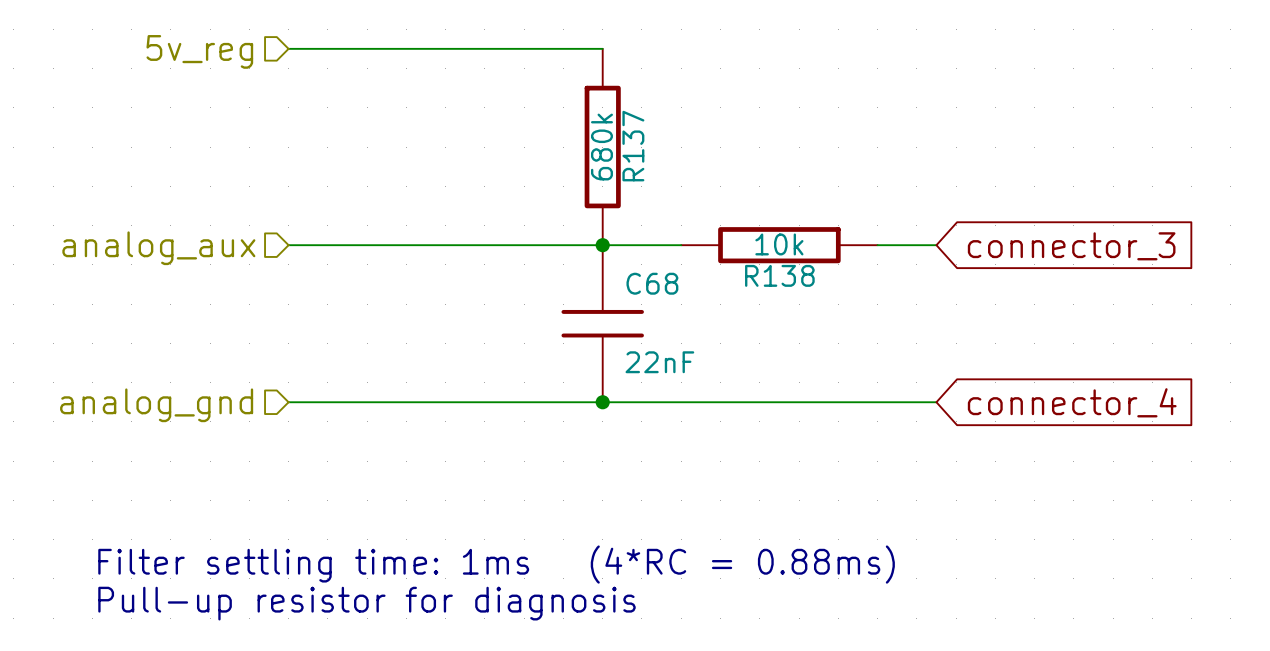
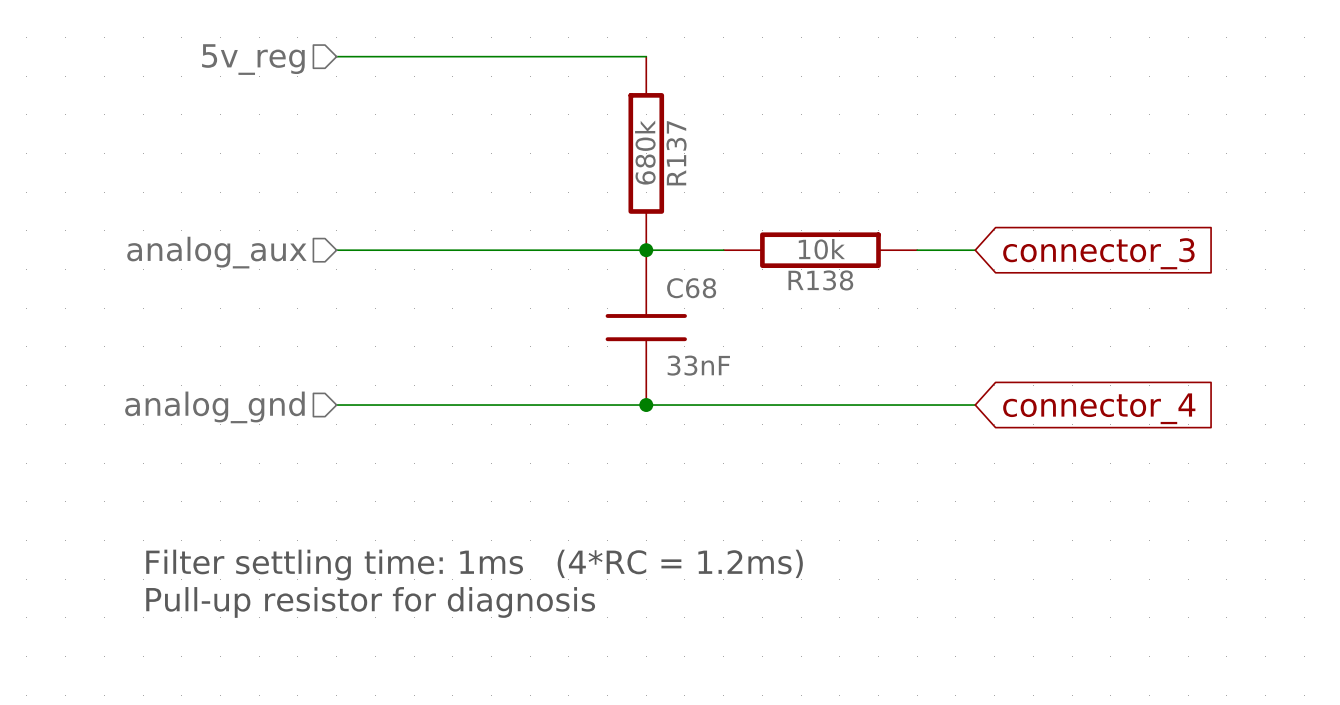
C68 value: 22nF (659, 362) -> 33nF (698, 365)
text: Filter settling time: 1ms (4*RC = 0.88ms) (496, 564) -> Filter settling time: 1ms (4*RC = 1.2ms) (474, 565)

